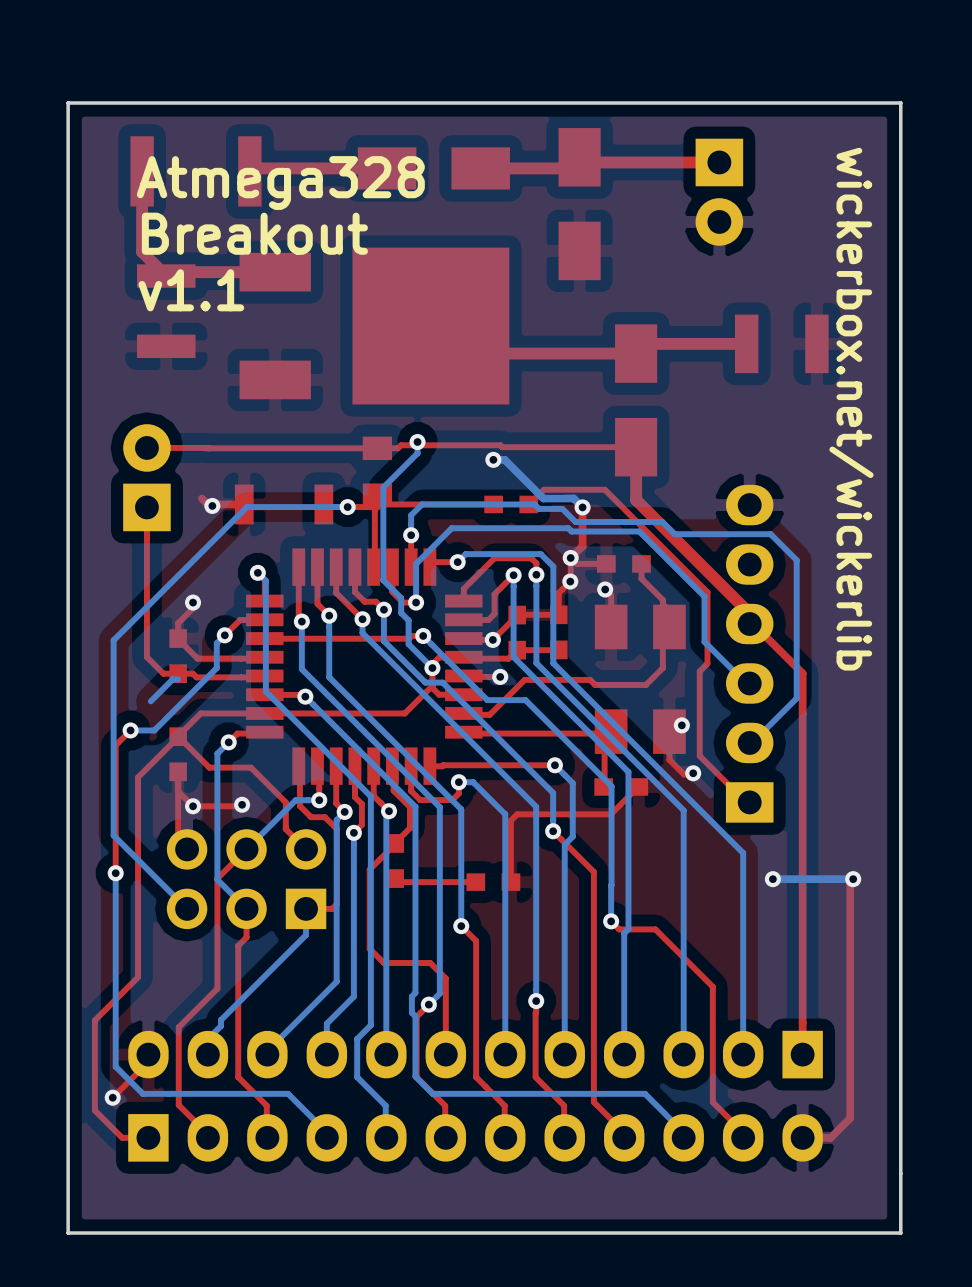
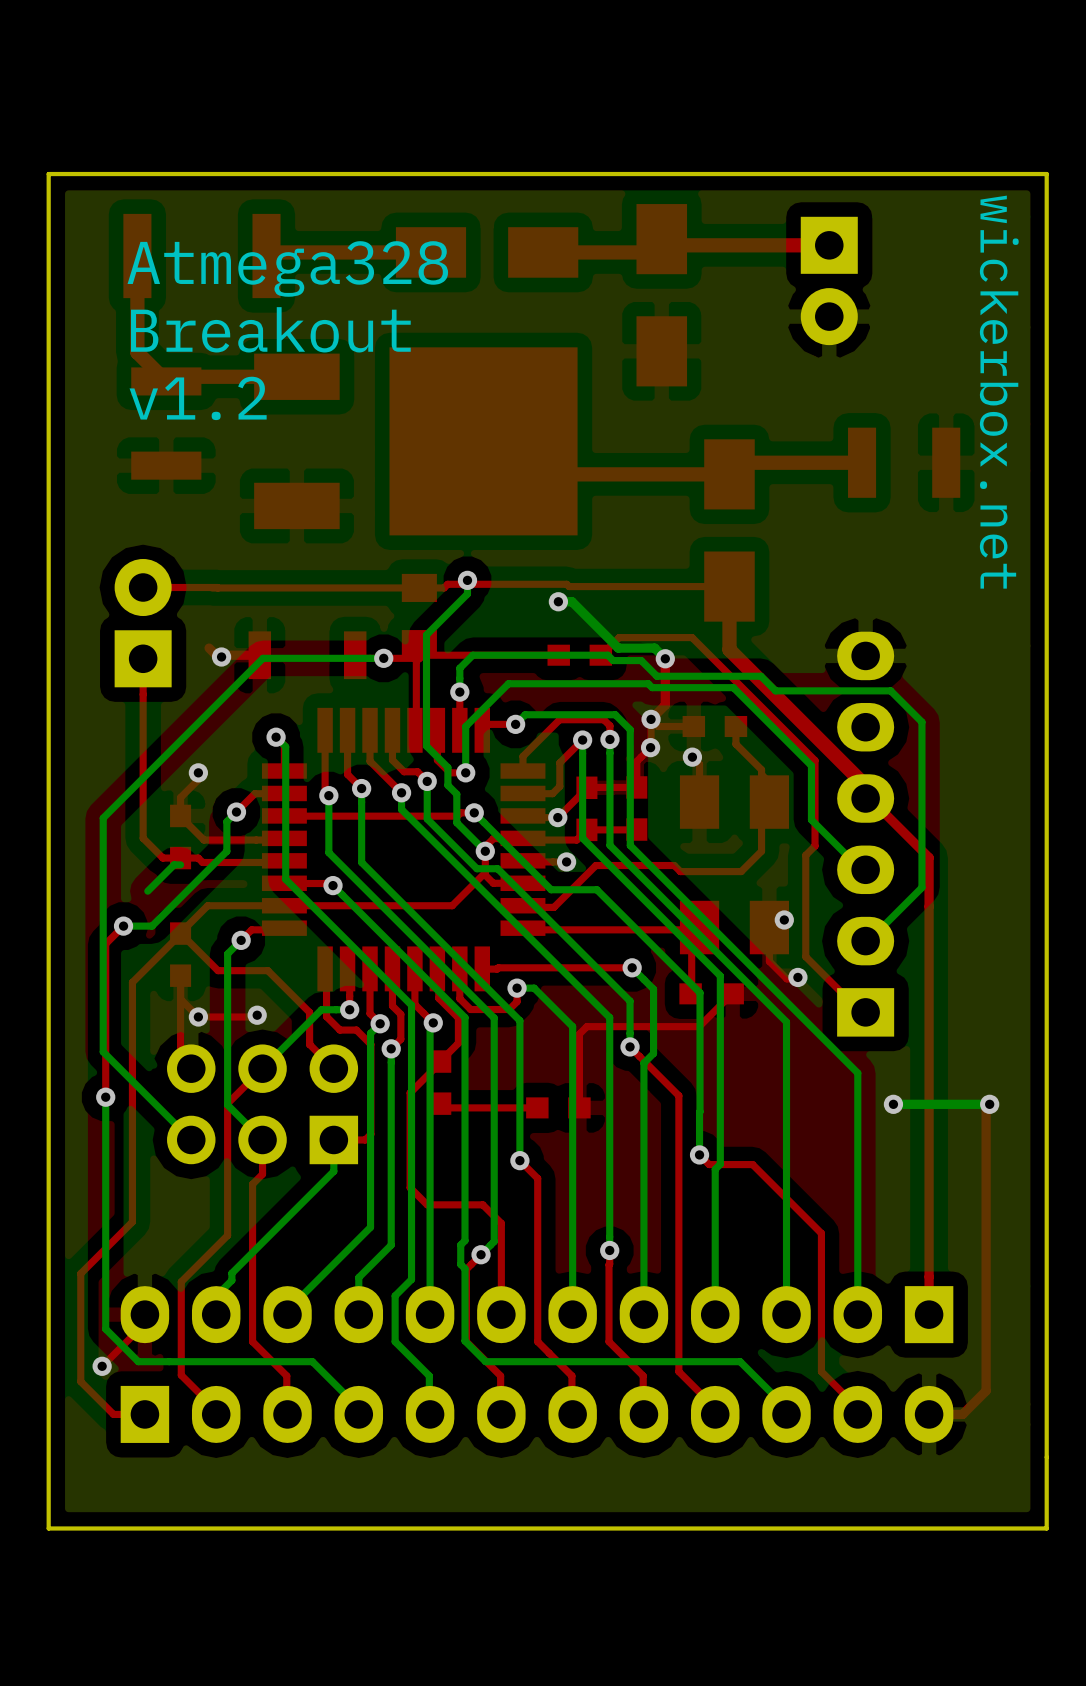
text: v1.1 (191, 290) -> v1.2 (198, 398)
text: wickerbox.net/wickerlib (851, 409) -> wickerbox.net (999, 392)

